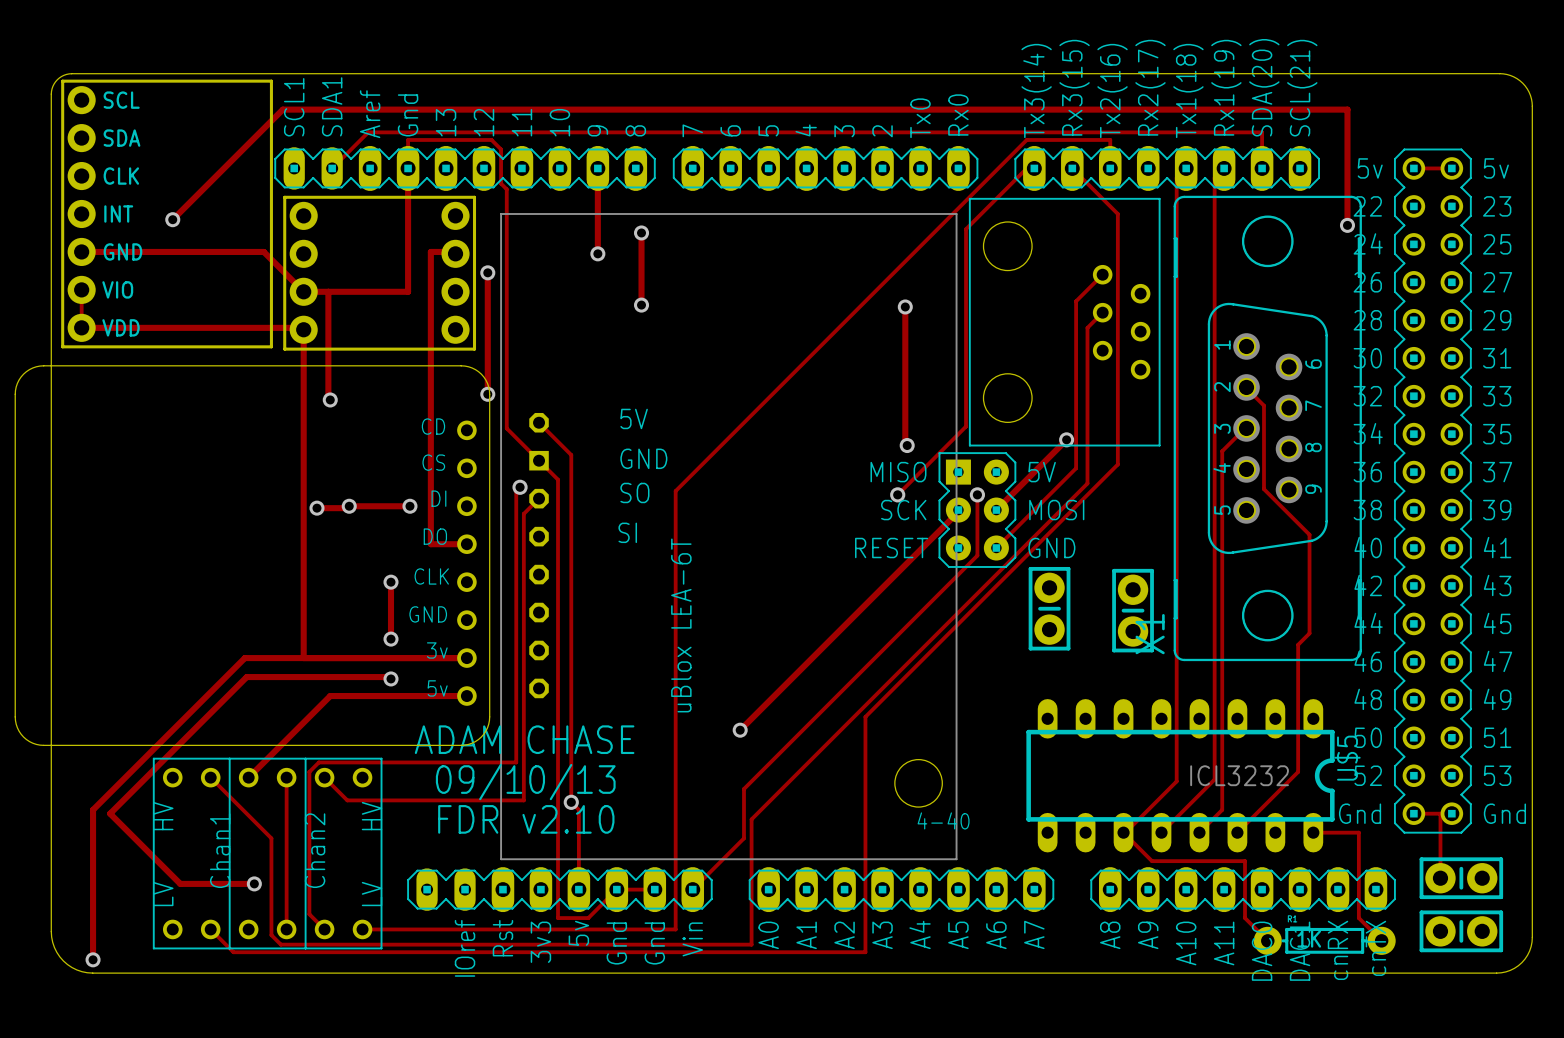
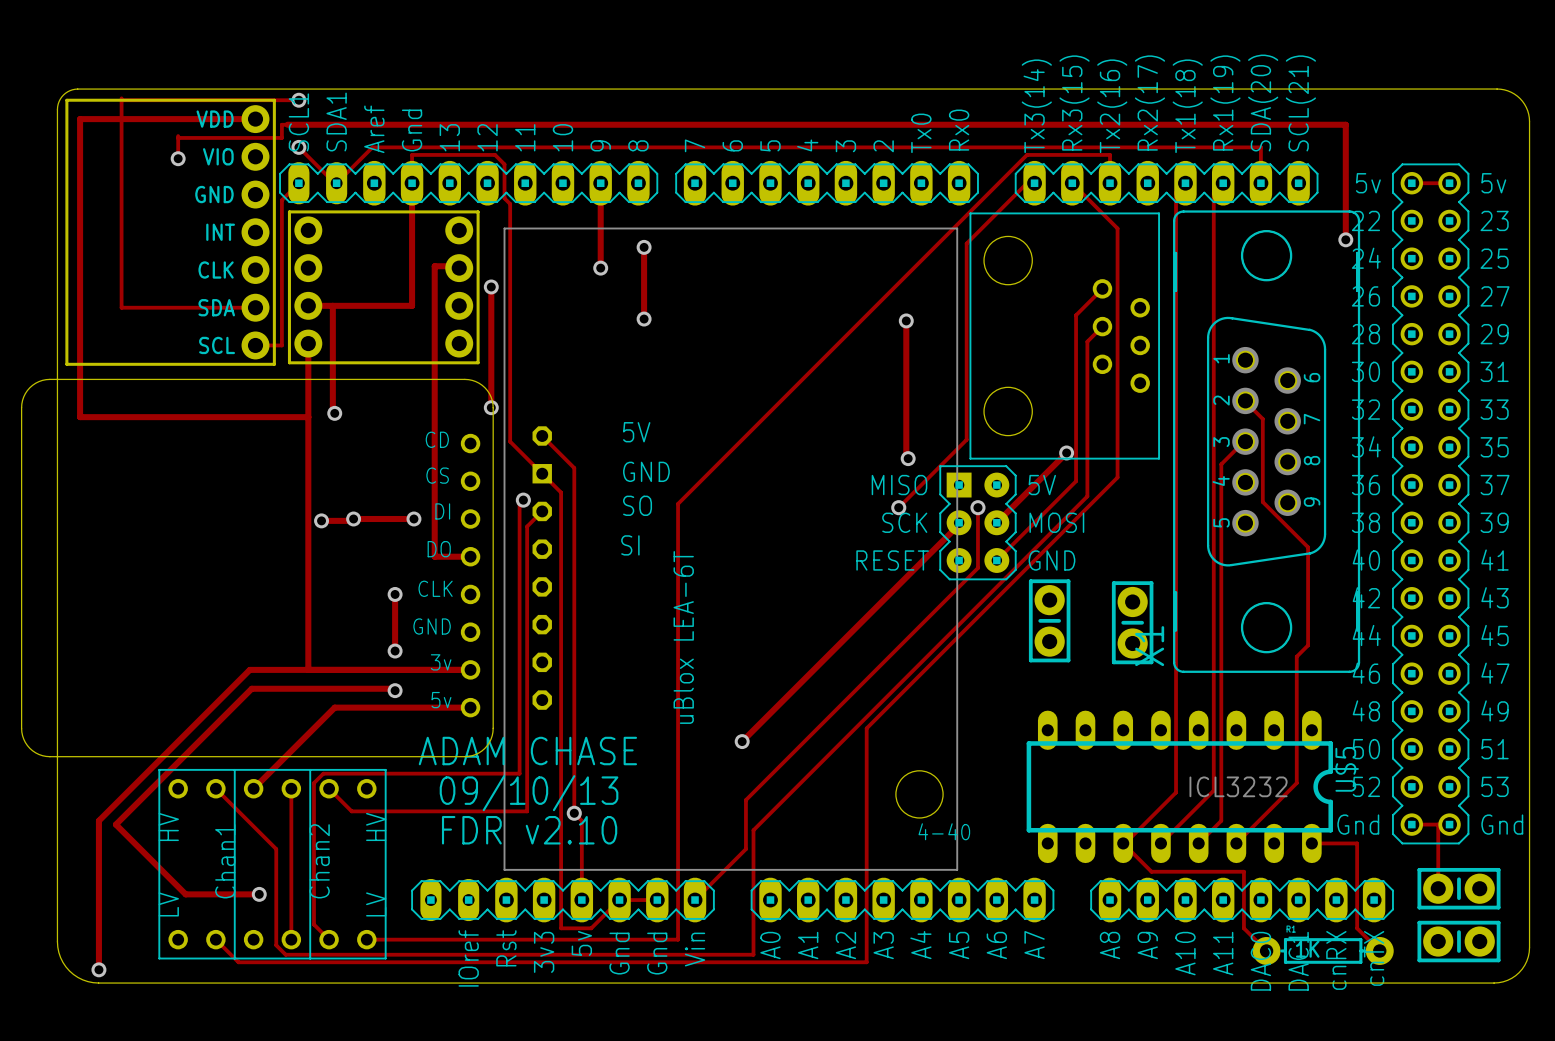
part footprint: [61, 79, 273, 349] -> [65, 98, 276, 366]
track: none -> (121, 98) (121, 307) (255, 307)
track: none -> (121, 100) (298, 100)
via: none -> (298, 100)
track: none -> (255, 119) (80, 119) (80, 417) (308, 417)
track: (282, 109) (172, 219) -> (287, 124) (281, 124) (281, 137) (178, 137)
track: none -> (178, 136) (178, 158)
track: none -> (298, 147) (336, 183)
via: none -> (298, 147)
via: none -> (178, 158)
track: none -> (298, 183) (281, 200) (281, 345) (255, 345)
via: (172, 219) -> none
track: (81, 251) (263, 251) (303, 291) -> none
track: (81, 289) (81, 327) (303, 327) -> none

